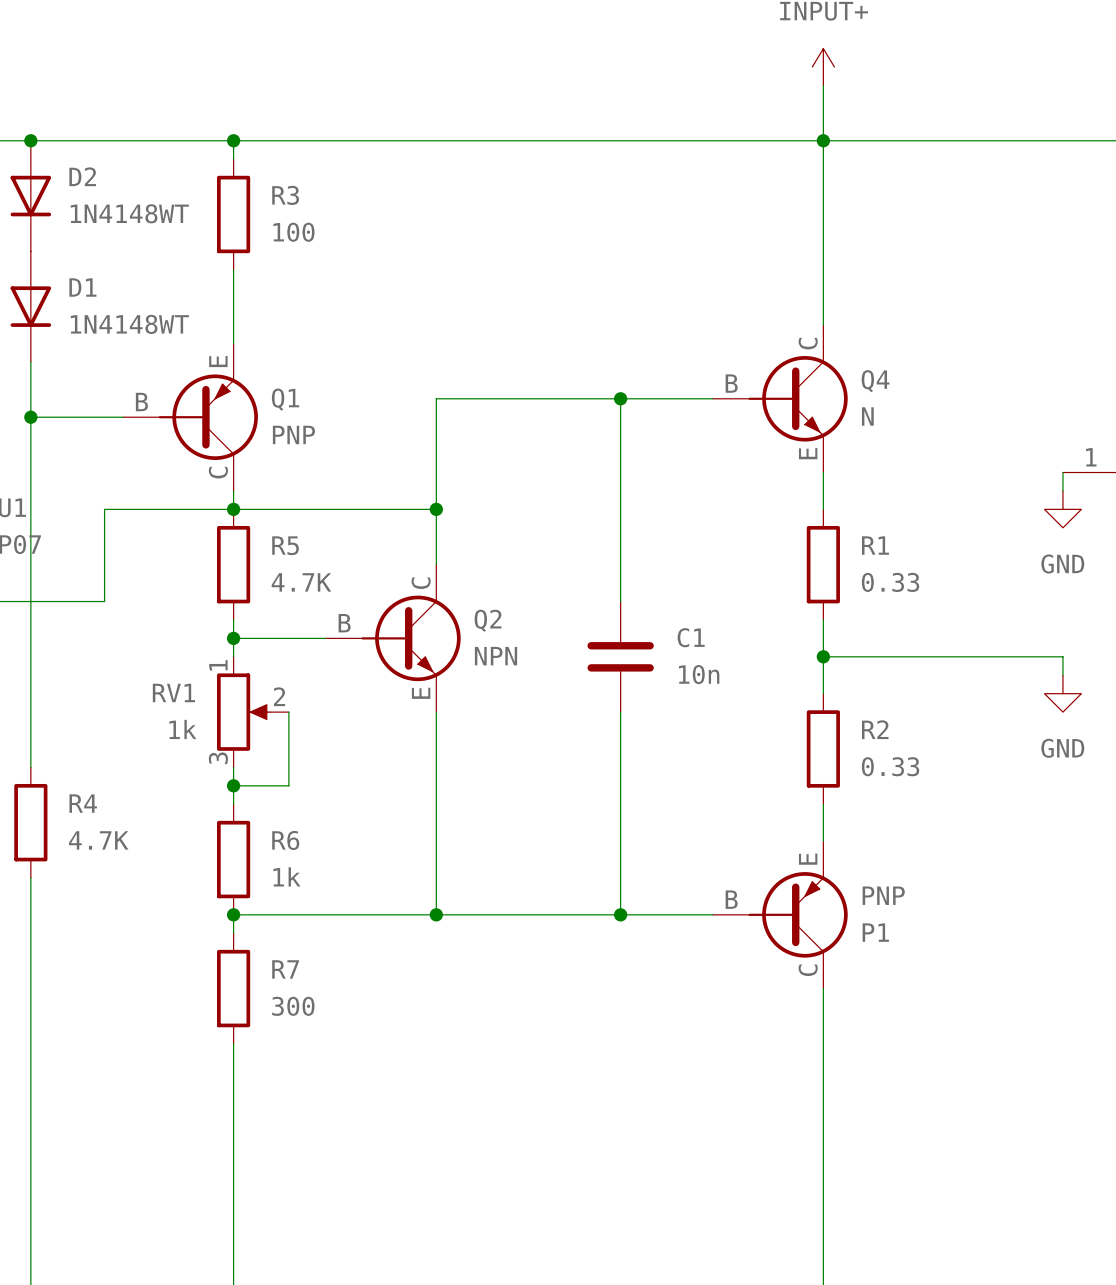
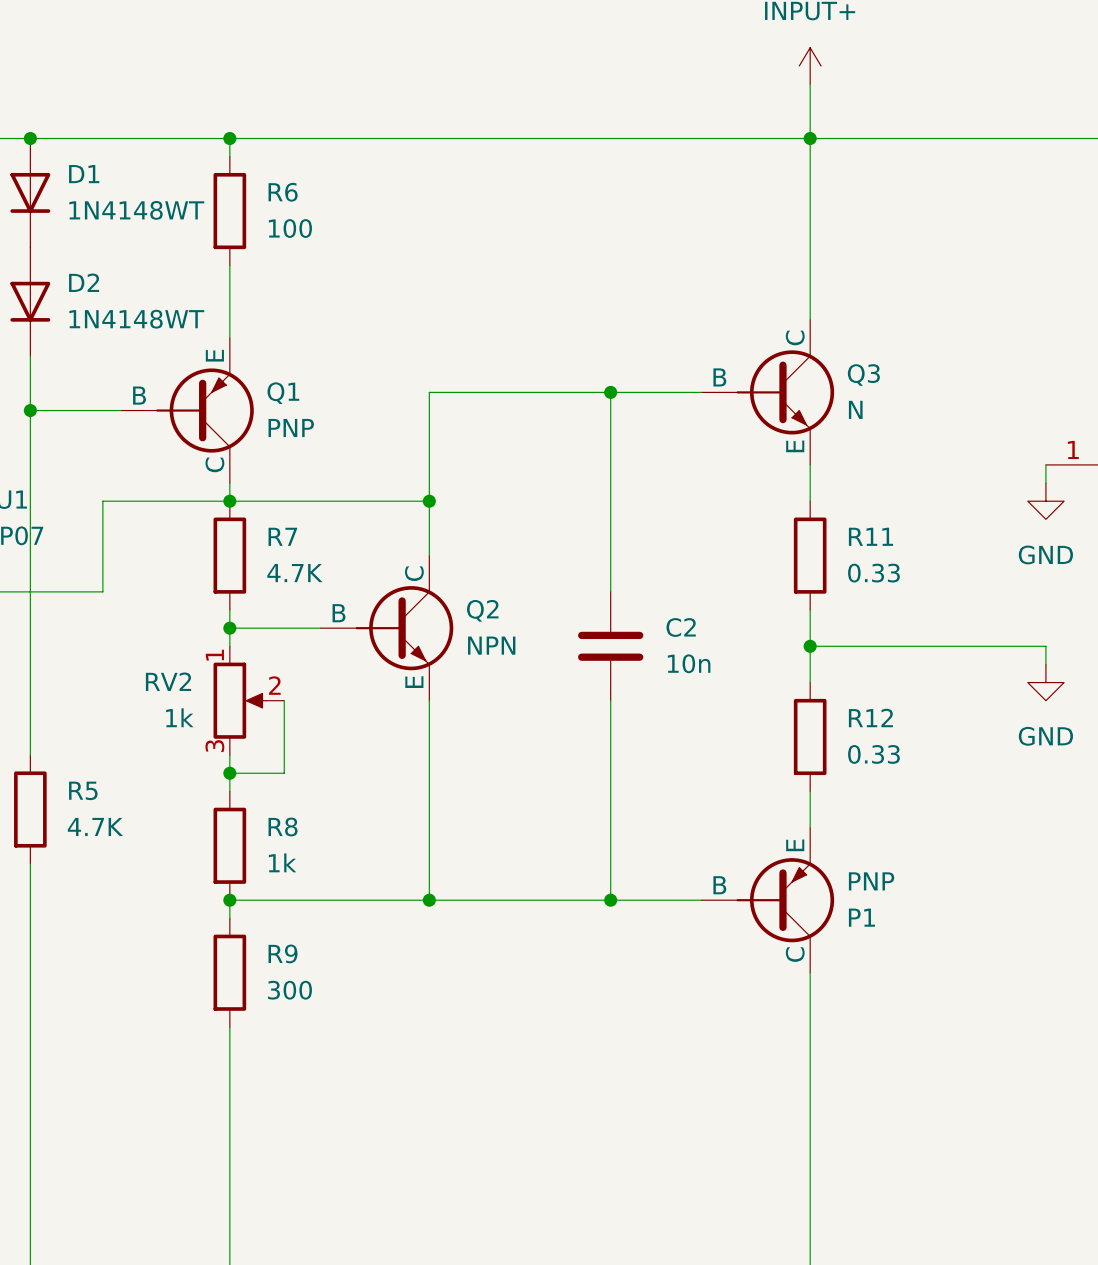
D2 name: D2 (82, 176) -> D1 (84, 174)
R3 name: R3 (285, 195) -> R6 (283, 192)
D1 name: D1 (82, 287) -> D2 (84, 282)
Q4 name: Q4 (875, 381) -> Q3 (863, 375)
R5 name: R5 (285, 545) -> R7 (282, 536)
R1 name: R1 (875, 545) -> R11 (870, 536)
C1 name: C1 (691, 637) -> C2 (681, 627)
RV1 name: RV1 (173, 692) -> RV2 (168, 681)
R2 name: R2 (875, 729) -> R12 (870, 717)
R4 name: R4 (83, 803) -> R5 (83, 790)
R6 name: R6 (285, 840) -> R8 (283, 826)
R7 name: R7 (285, 969) -> R9 (283, 953)

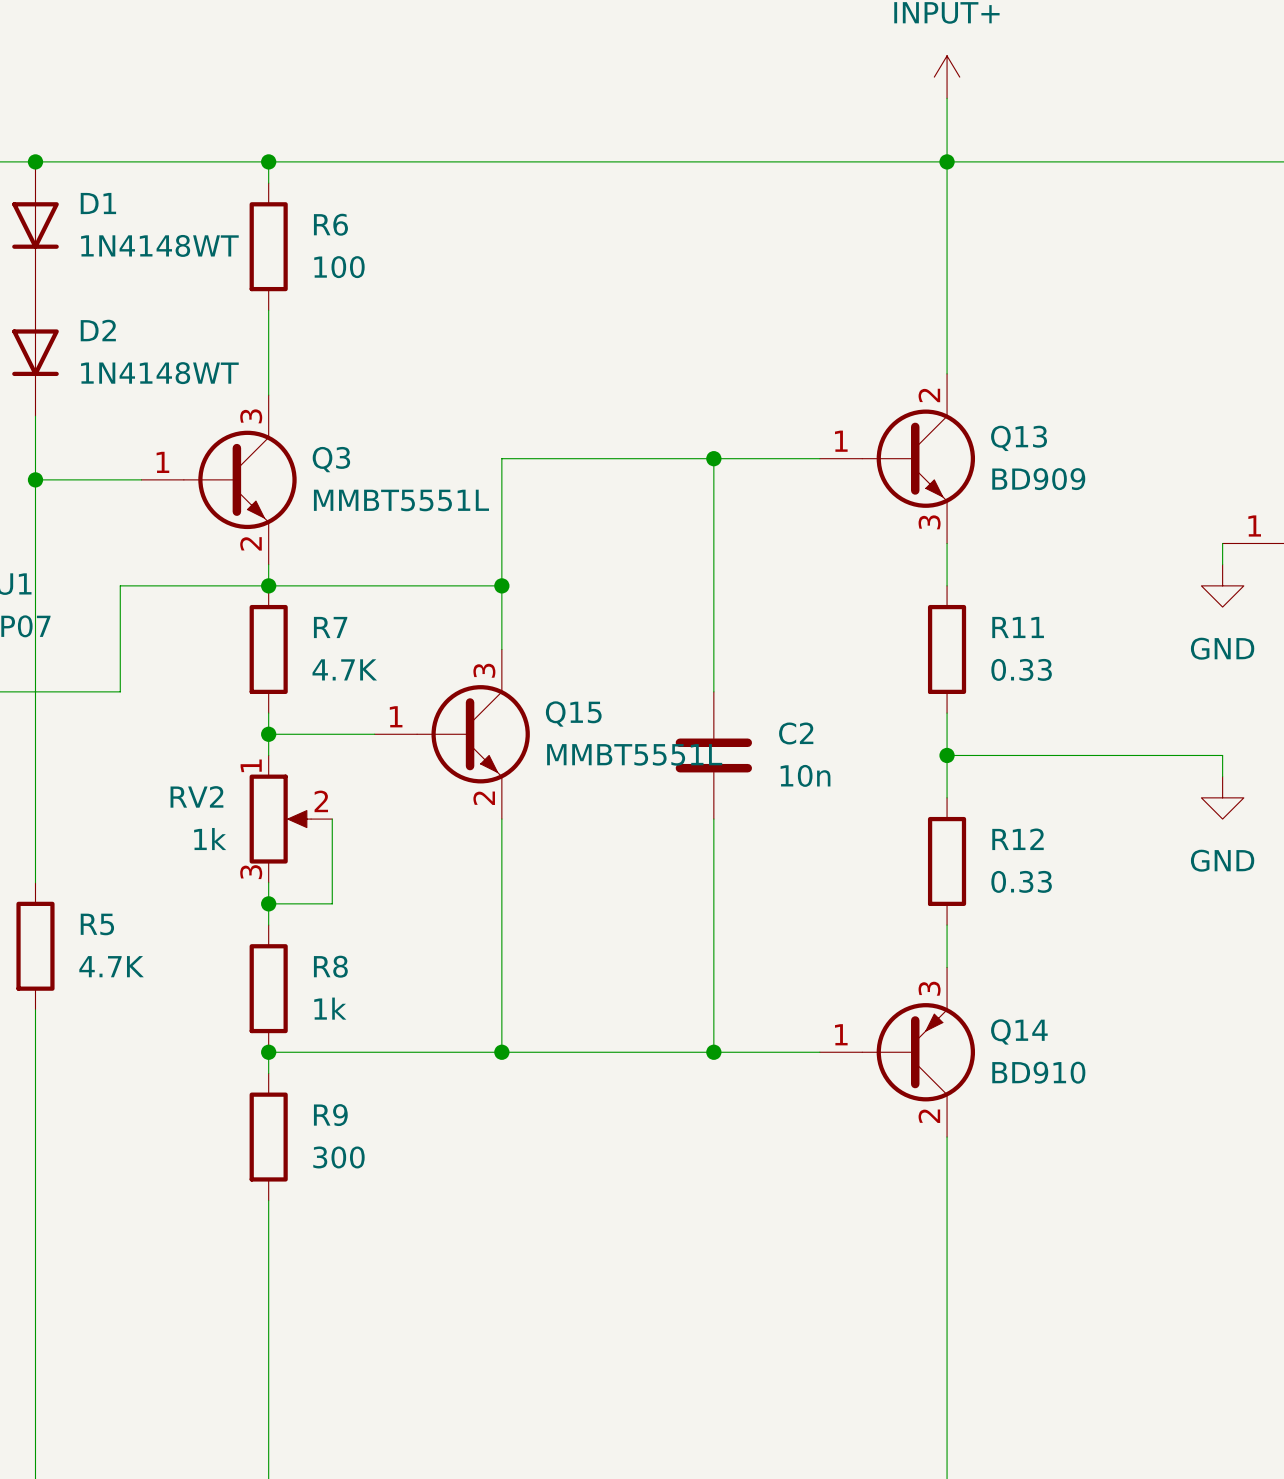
Q3 symbol: [701, 319, 835, 465] -> [141, 395, 297, 565]
Q13: none -> BD909 (897, 458)
Q3 value: N (855, 409) -> MMBT5551L (401, 500)
Q1: PNP (187, 410) -> none
Q2: NPN (386, 628) -> none
Q15: none -> MMBT5551L (452, 734)
P1: PNP (767, 900) -> none
Q14: none -> BD910 (897, 1052)

